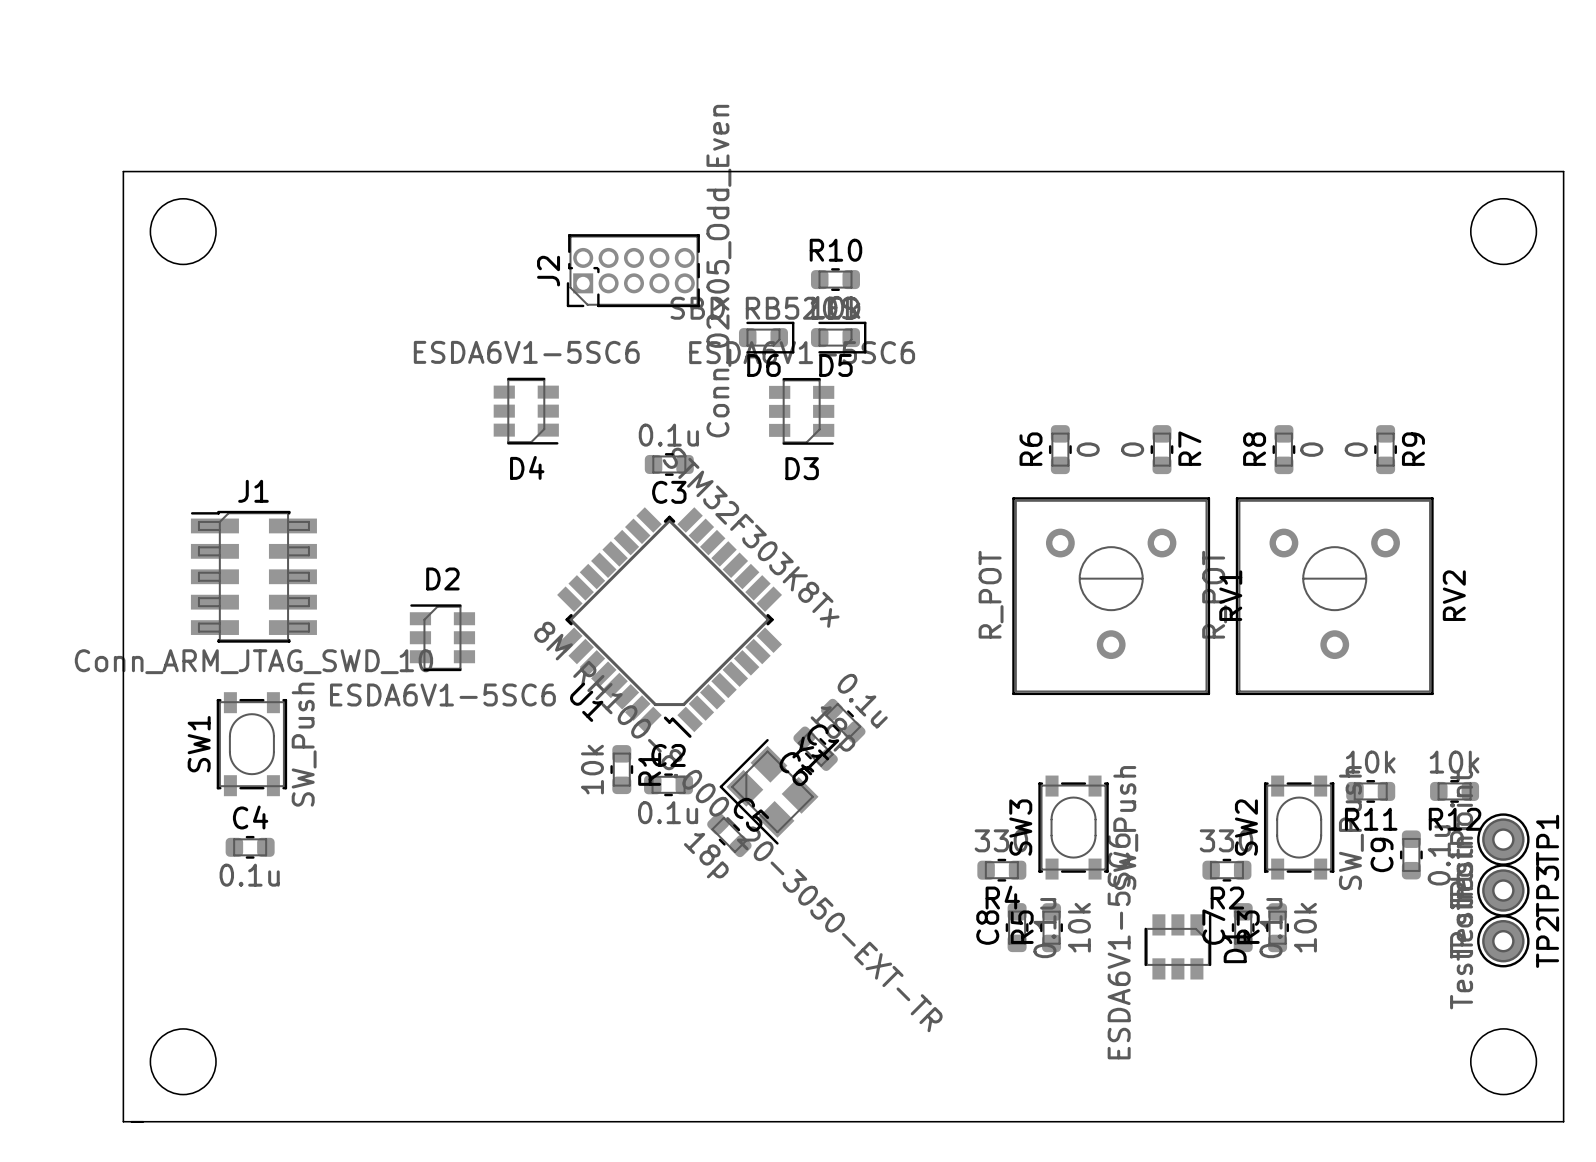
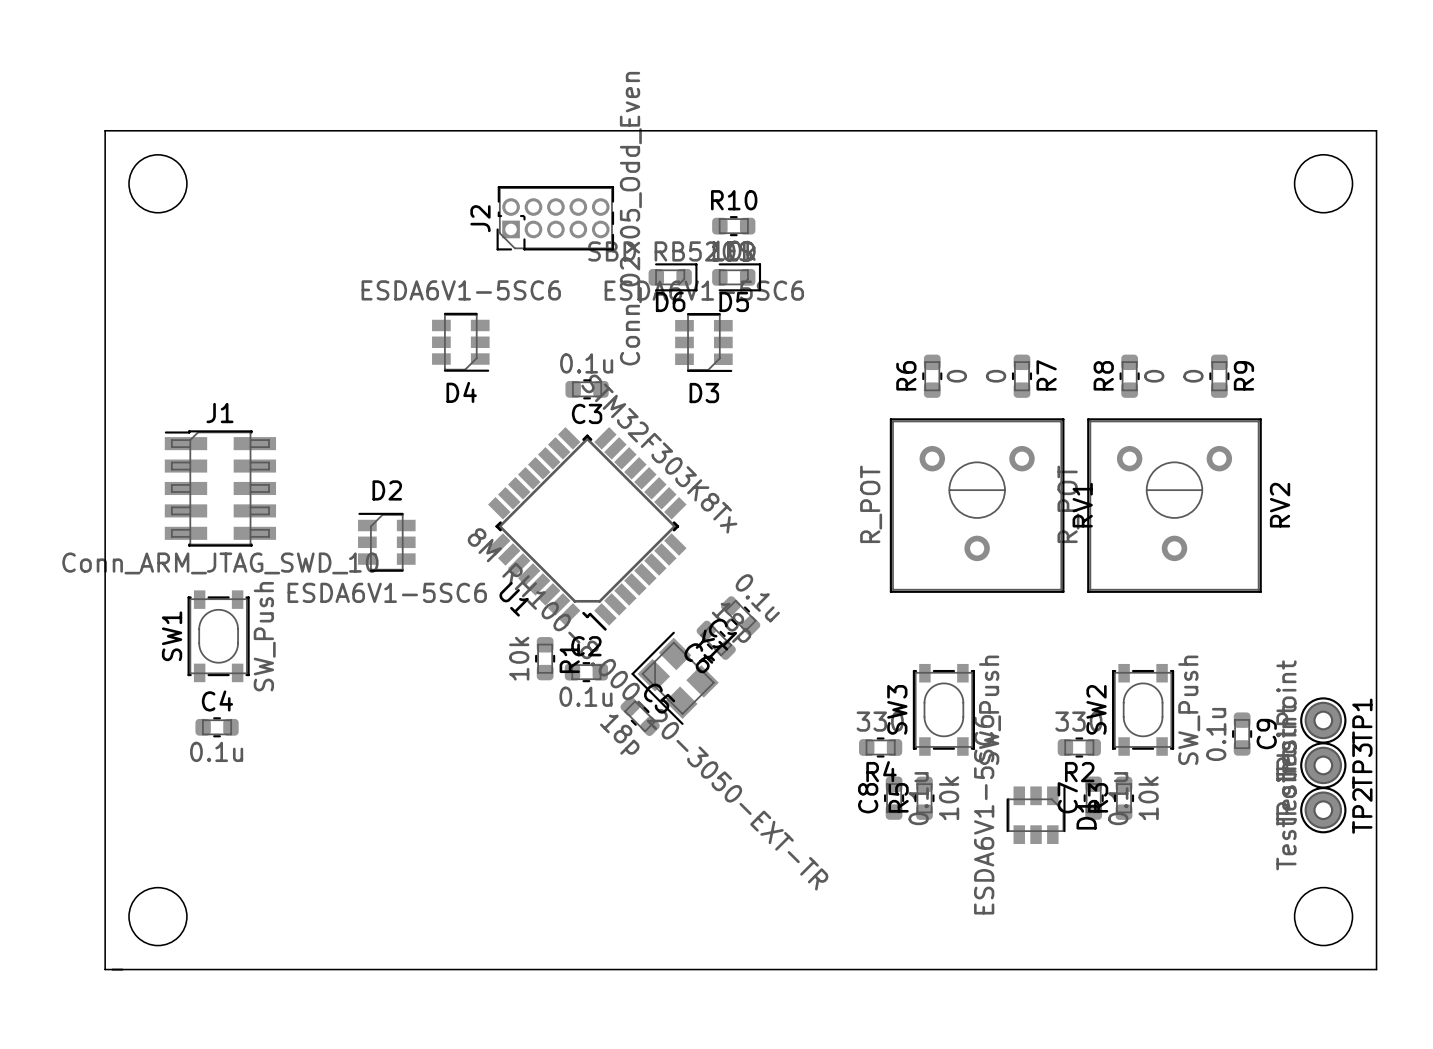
R11: 10k (1370, 791) -> none
R12: 10k (1454, 791) -> none
C9 name position: C9 (1382, 854) -> C9 (1266, 734)
C9 value position: 0.1u (1439, 855) -> 0.1u (1216, 734)

